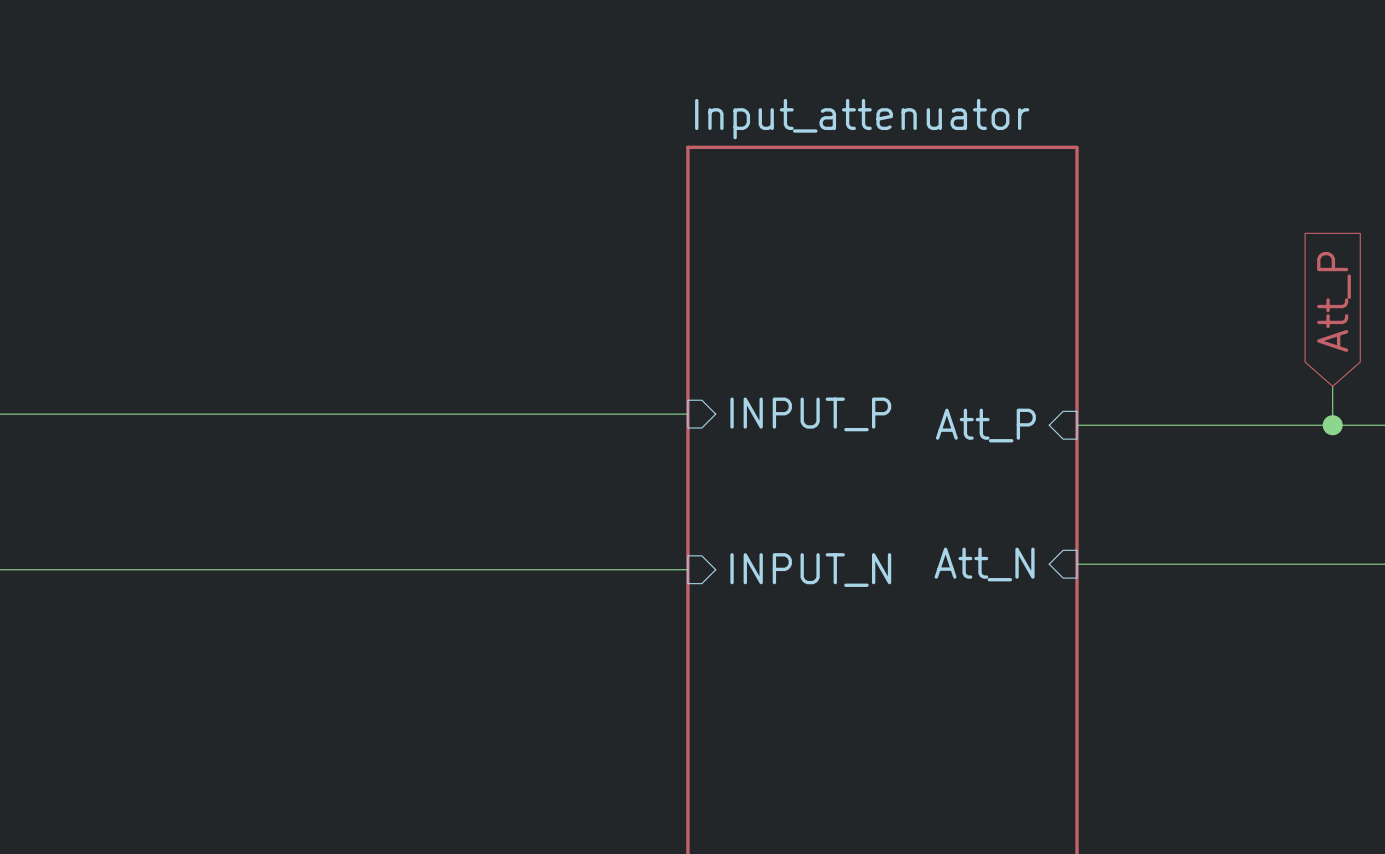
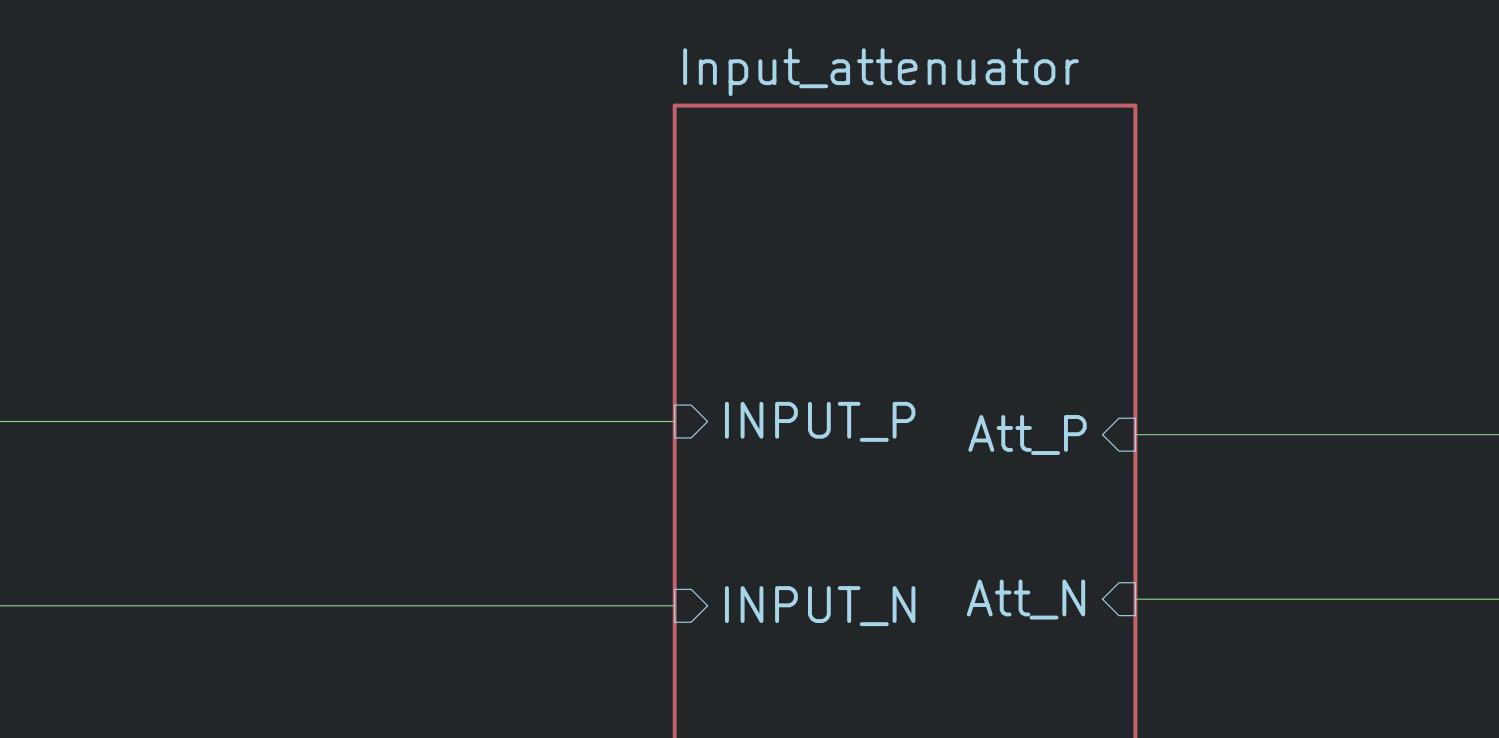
global label: Att_P (1334, 301) -> none
wire: (1332, 386) (1332, 425) -> none
junction: (1332, 425) -> none

